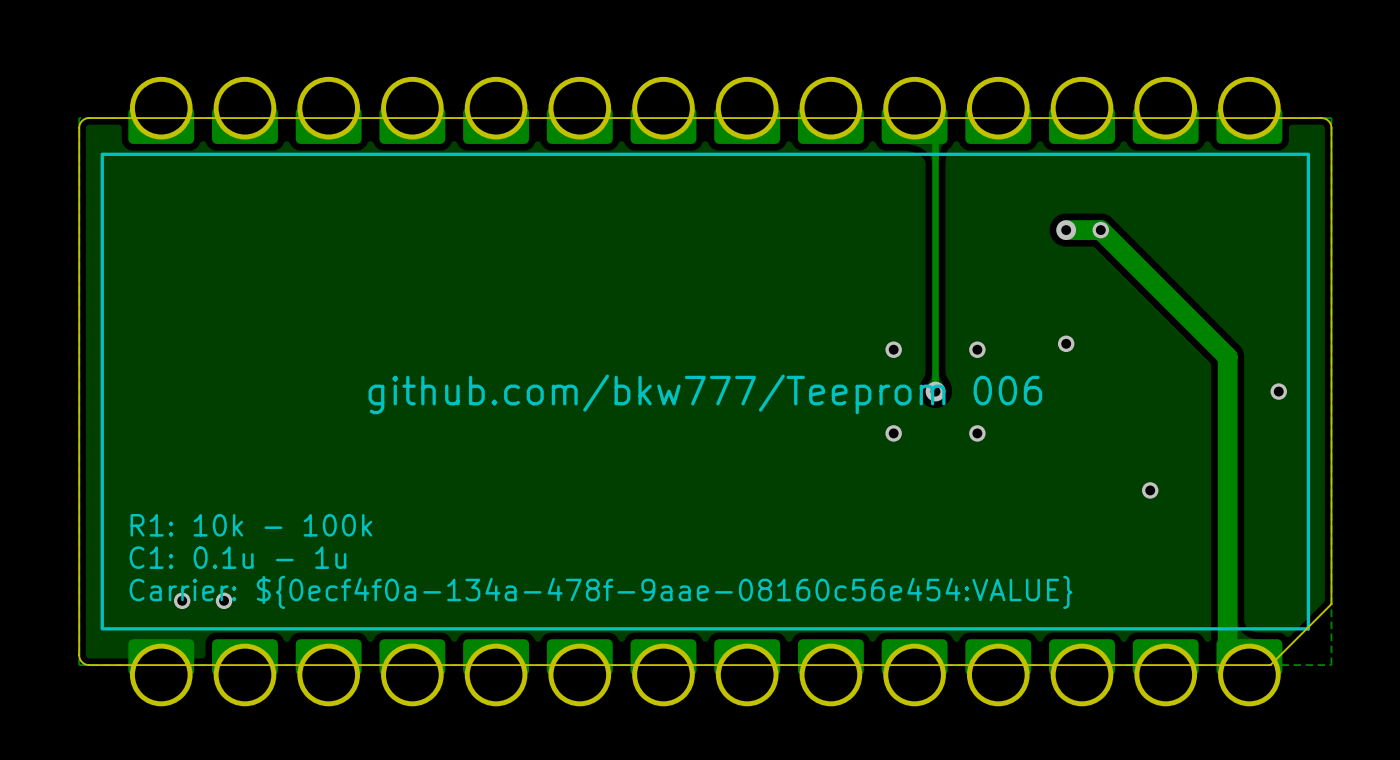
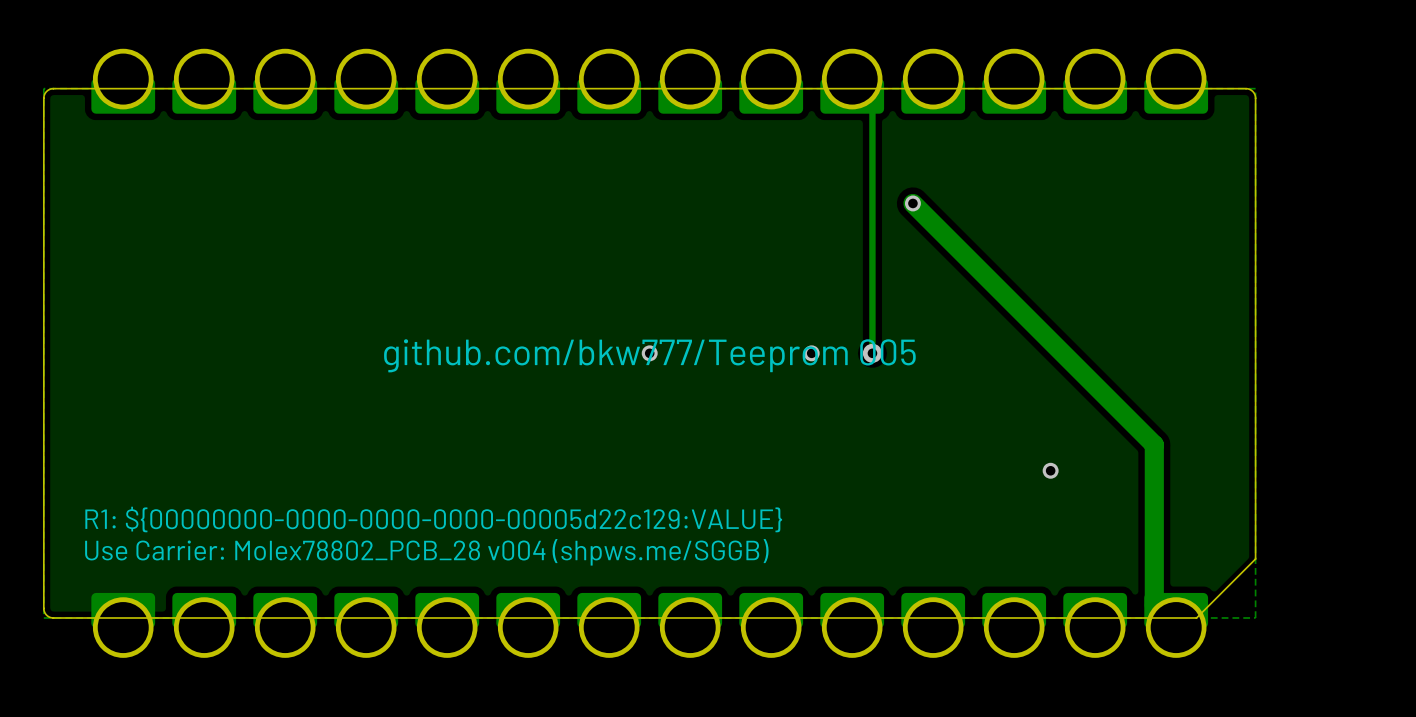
drawing: [100, 152, 1311, 631] -> none
track: (1066, 230) (1100, 230) (1227, 356) (1227, 653) -> (912, 203) (1154, 444) (1155, 606)
via: (1066, 230) -> none
via: (1100, 230) -> none
via: none -> (912, 203)
via: (1066, 343) -> none
via: (893, 349) -> none
via: (977, 349) -> none
via: none -> (649, 353)
via: none -> (811, 353)
via: (1278, 391) -> none
text: github.com/bkw777/Teeprom 006 (705, 394) -> github.com/bkw777/Teeprom 005 (649, 355)
via: (893, 433) -> none
via: (977, 433) -> none
via position: (1150, 490) -> (1050, 470)
text: R1: 10k - 100k (251, 525) -> none
text: C1: 0.1u - 1u (237, 557) -> R1: ${00000000-0000-0000-0000-00005d22c129:VALUE} (433, 519)
text: Carrier: ${0ecf4f0a-134a-478f-9aae-08160c56e454:VALUE} (601, 592) -> Use Carrier: Molex78802_PCB_28 v004 (shpws.me/SGGB) (426, 552)
via: (182, 600) -> none
via: (224, 600) -> none

